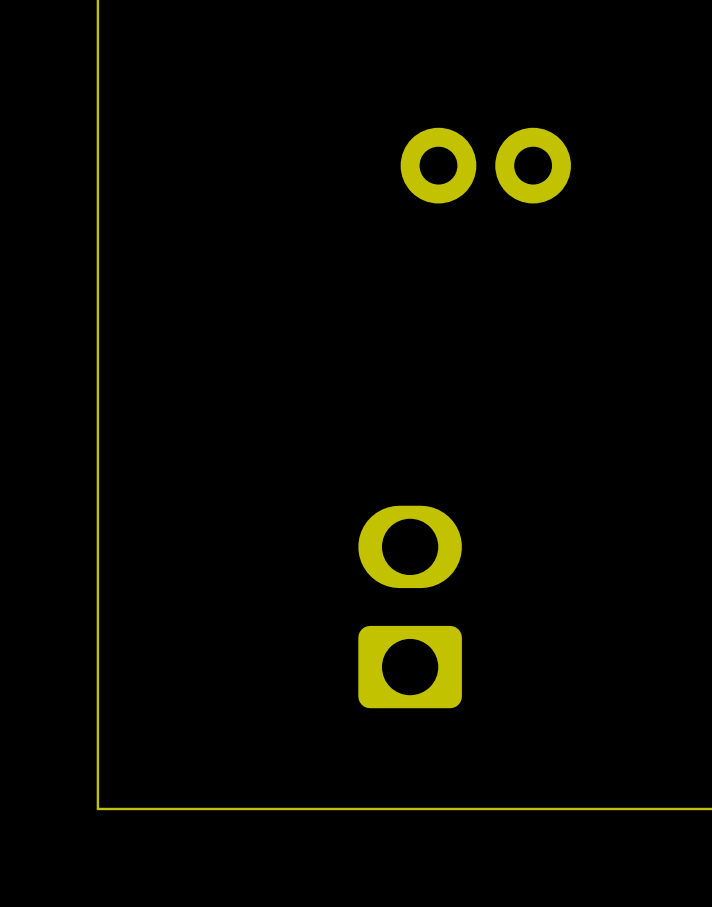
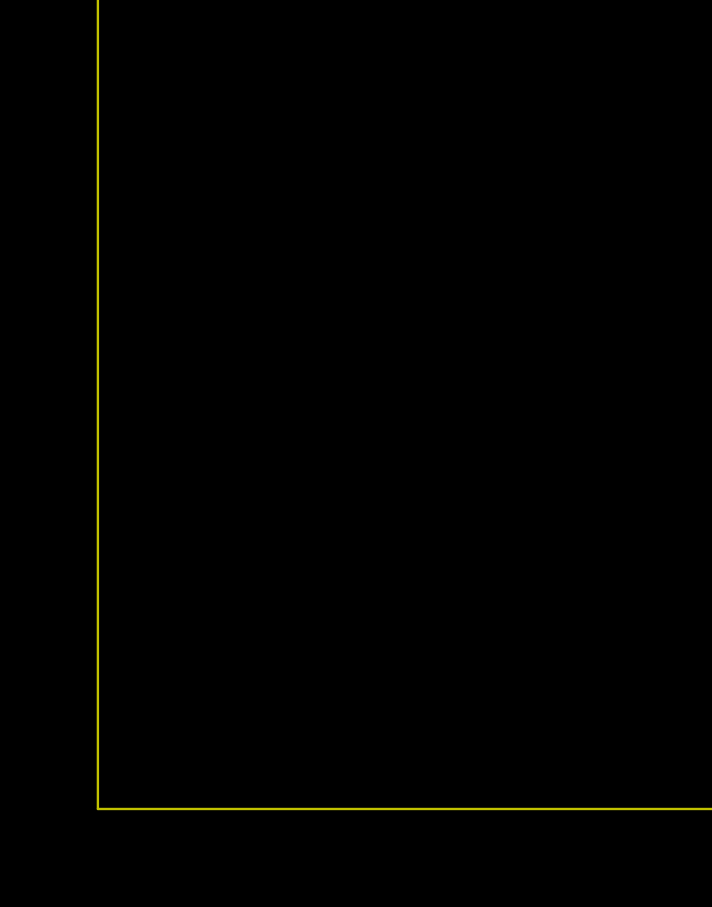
part: (485, 165) -> none
part: (410, 606) -> none

